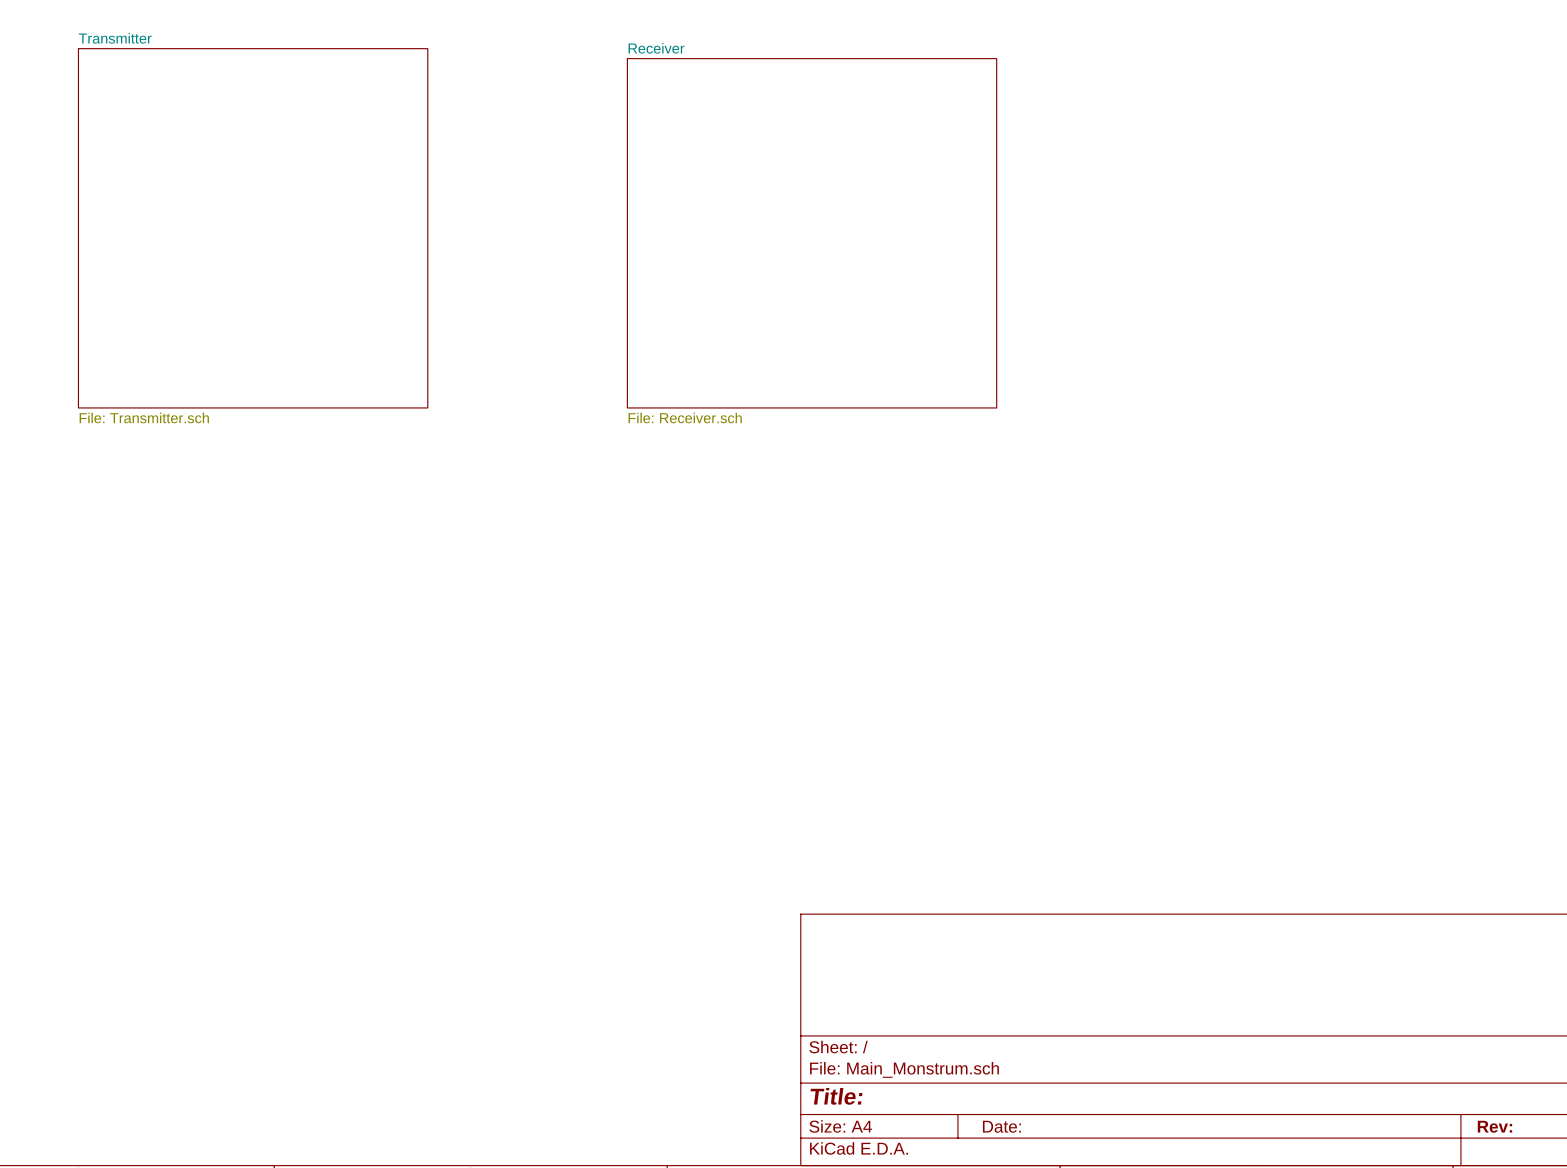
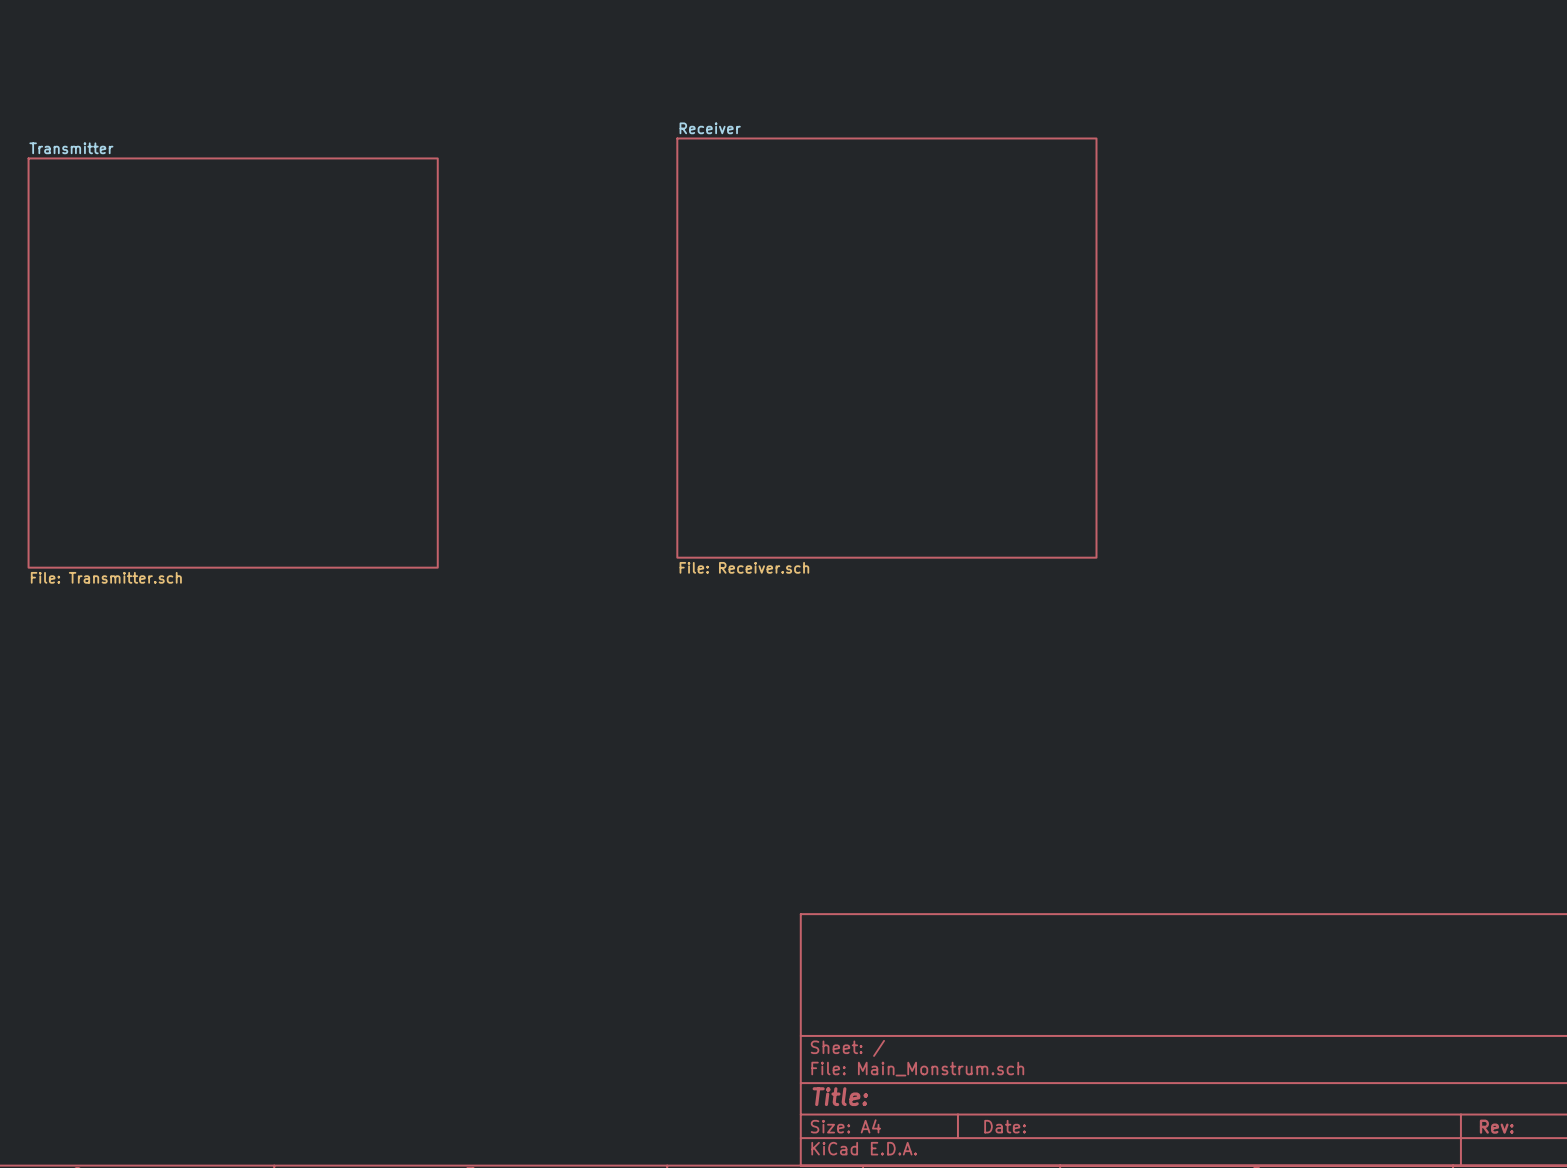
sheet Transmitter: File: Transmitter.sch (253, 228) -> none
sheet Receiver: File: Receiver.sch (812, 233) -> none
sheet Receiver: none -> File: Receiver.sch (886, 348)
sheet Transmitter: none -> File: Transmitter.sch (233, 363)

